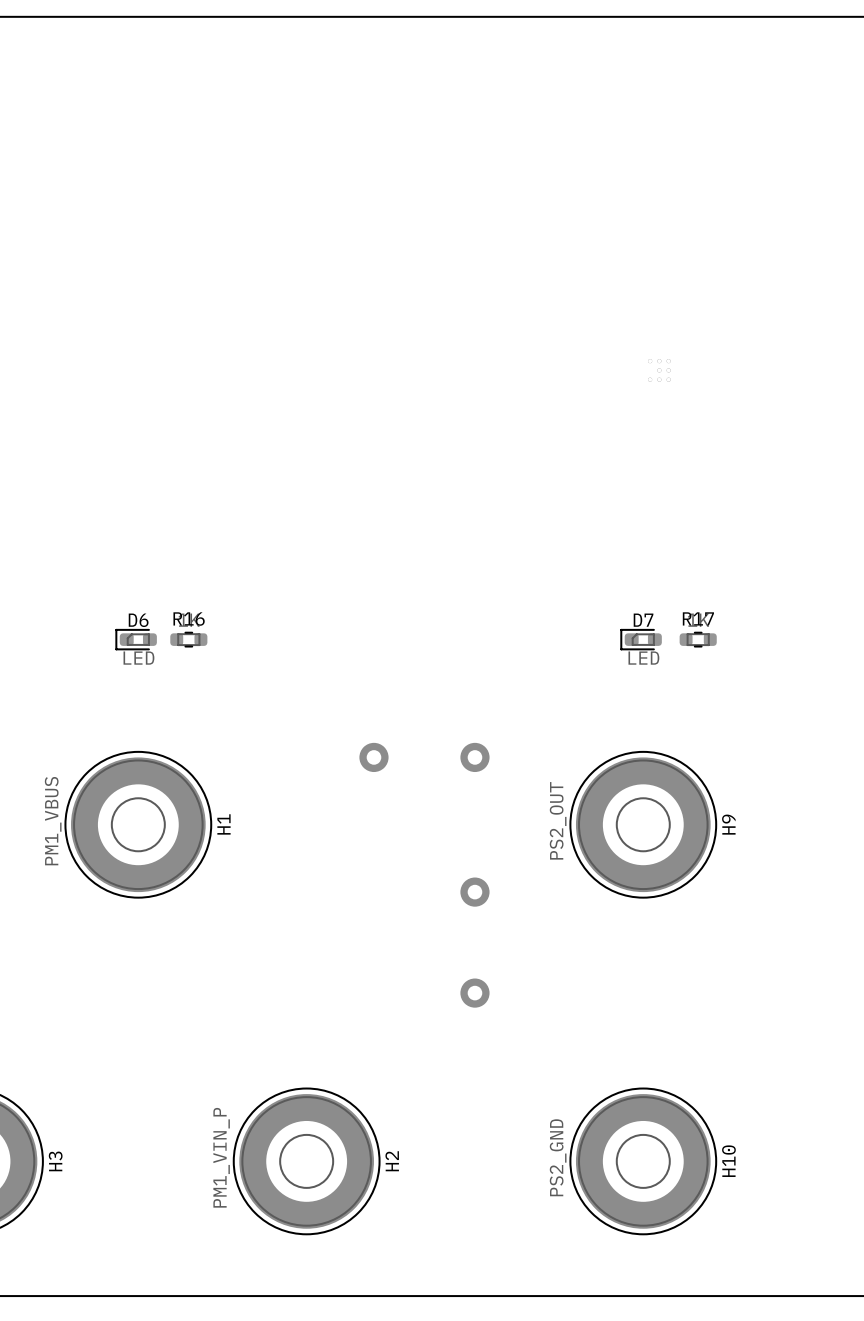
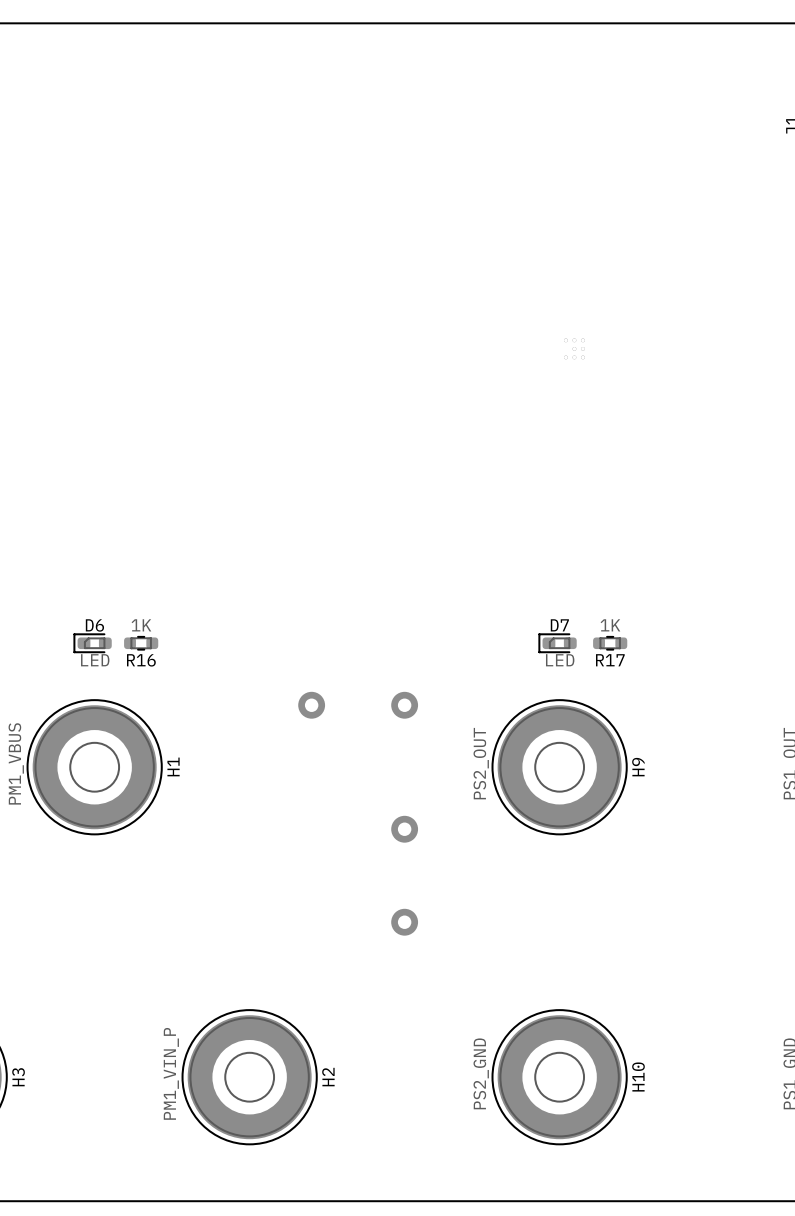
R17 name position: R17 (698, 618) -> R17 (610, 660)
R16 name position: R16 (189, 619) -> R16 (141, 660)
D6 position: (136, 639) -> (92, 643)
R16 position: (188, 639) -> (141, 643)
D7 position: (641, 639) -> (557, 643)
R17 position: (698, 639) -> (610, 643)

